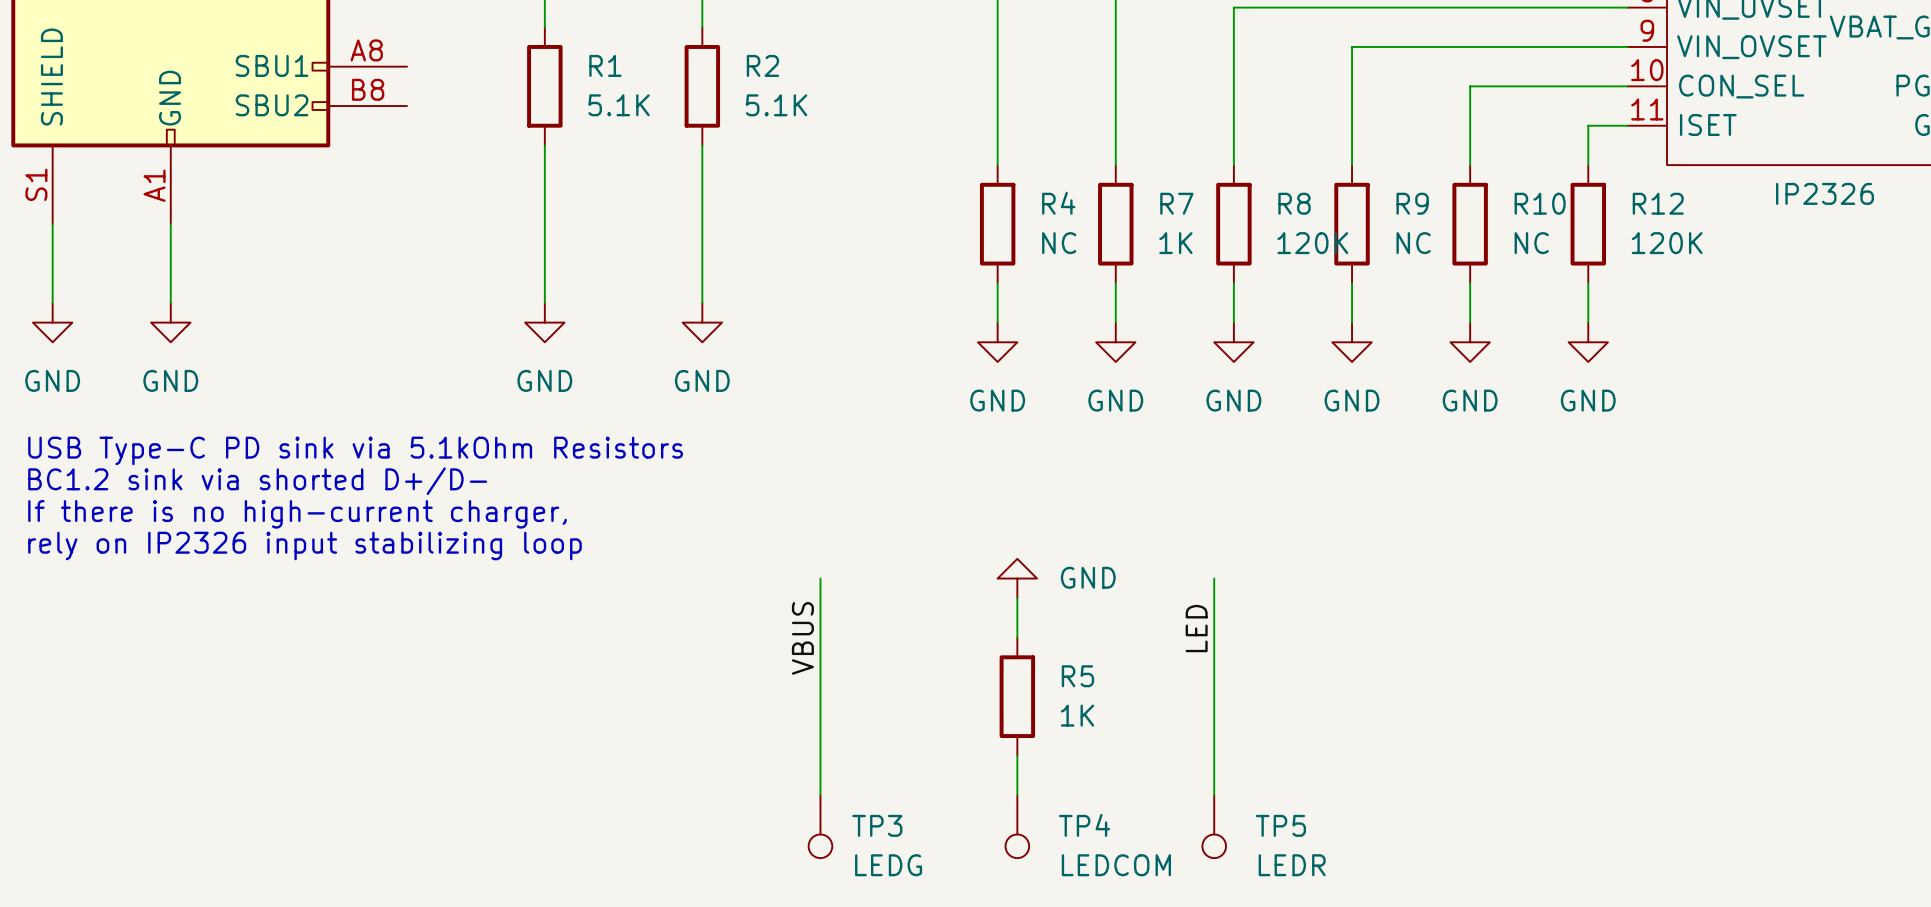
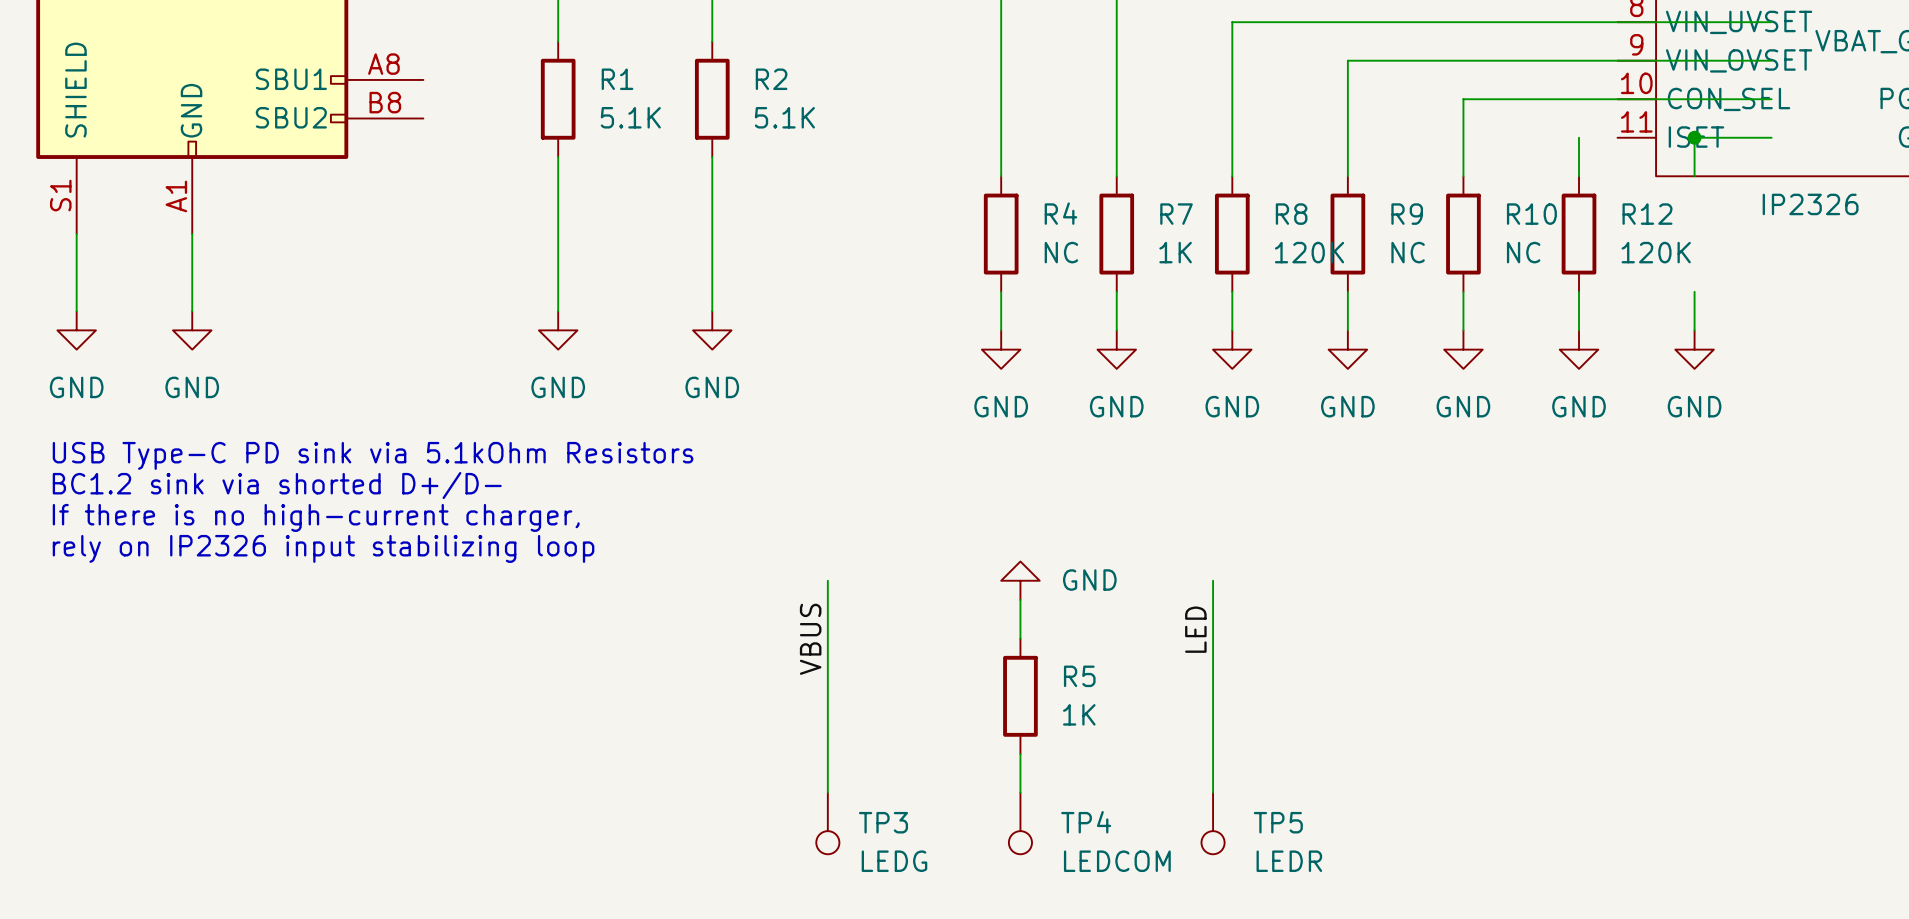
wire: none -> (1617, 22) (1771, 22)
wire: none -> (1617, 60) (1771, 60)
wire: none -> (1617, 99) (1771, 99)
wire: (1588, 125) (1627, 125) -> none
junction: none -> (1694, 137)
wire: none -> (1771, 137) (1694, 137) (1694, 176)
wire: none -> (1694, 291) (1694, 330)
power symbol: none -> GND (1694, 349)

